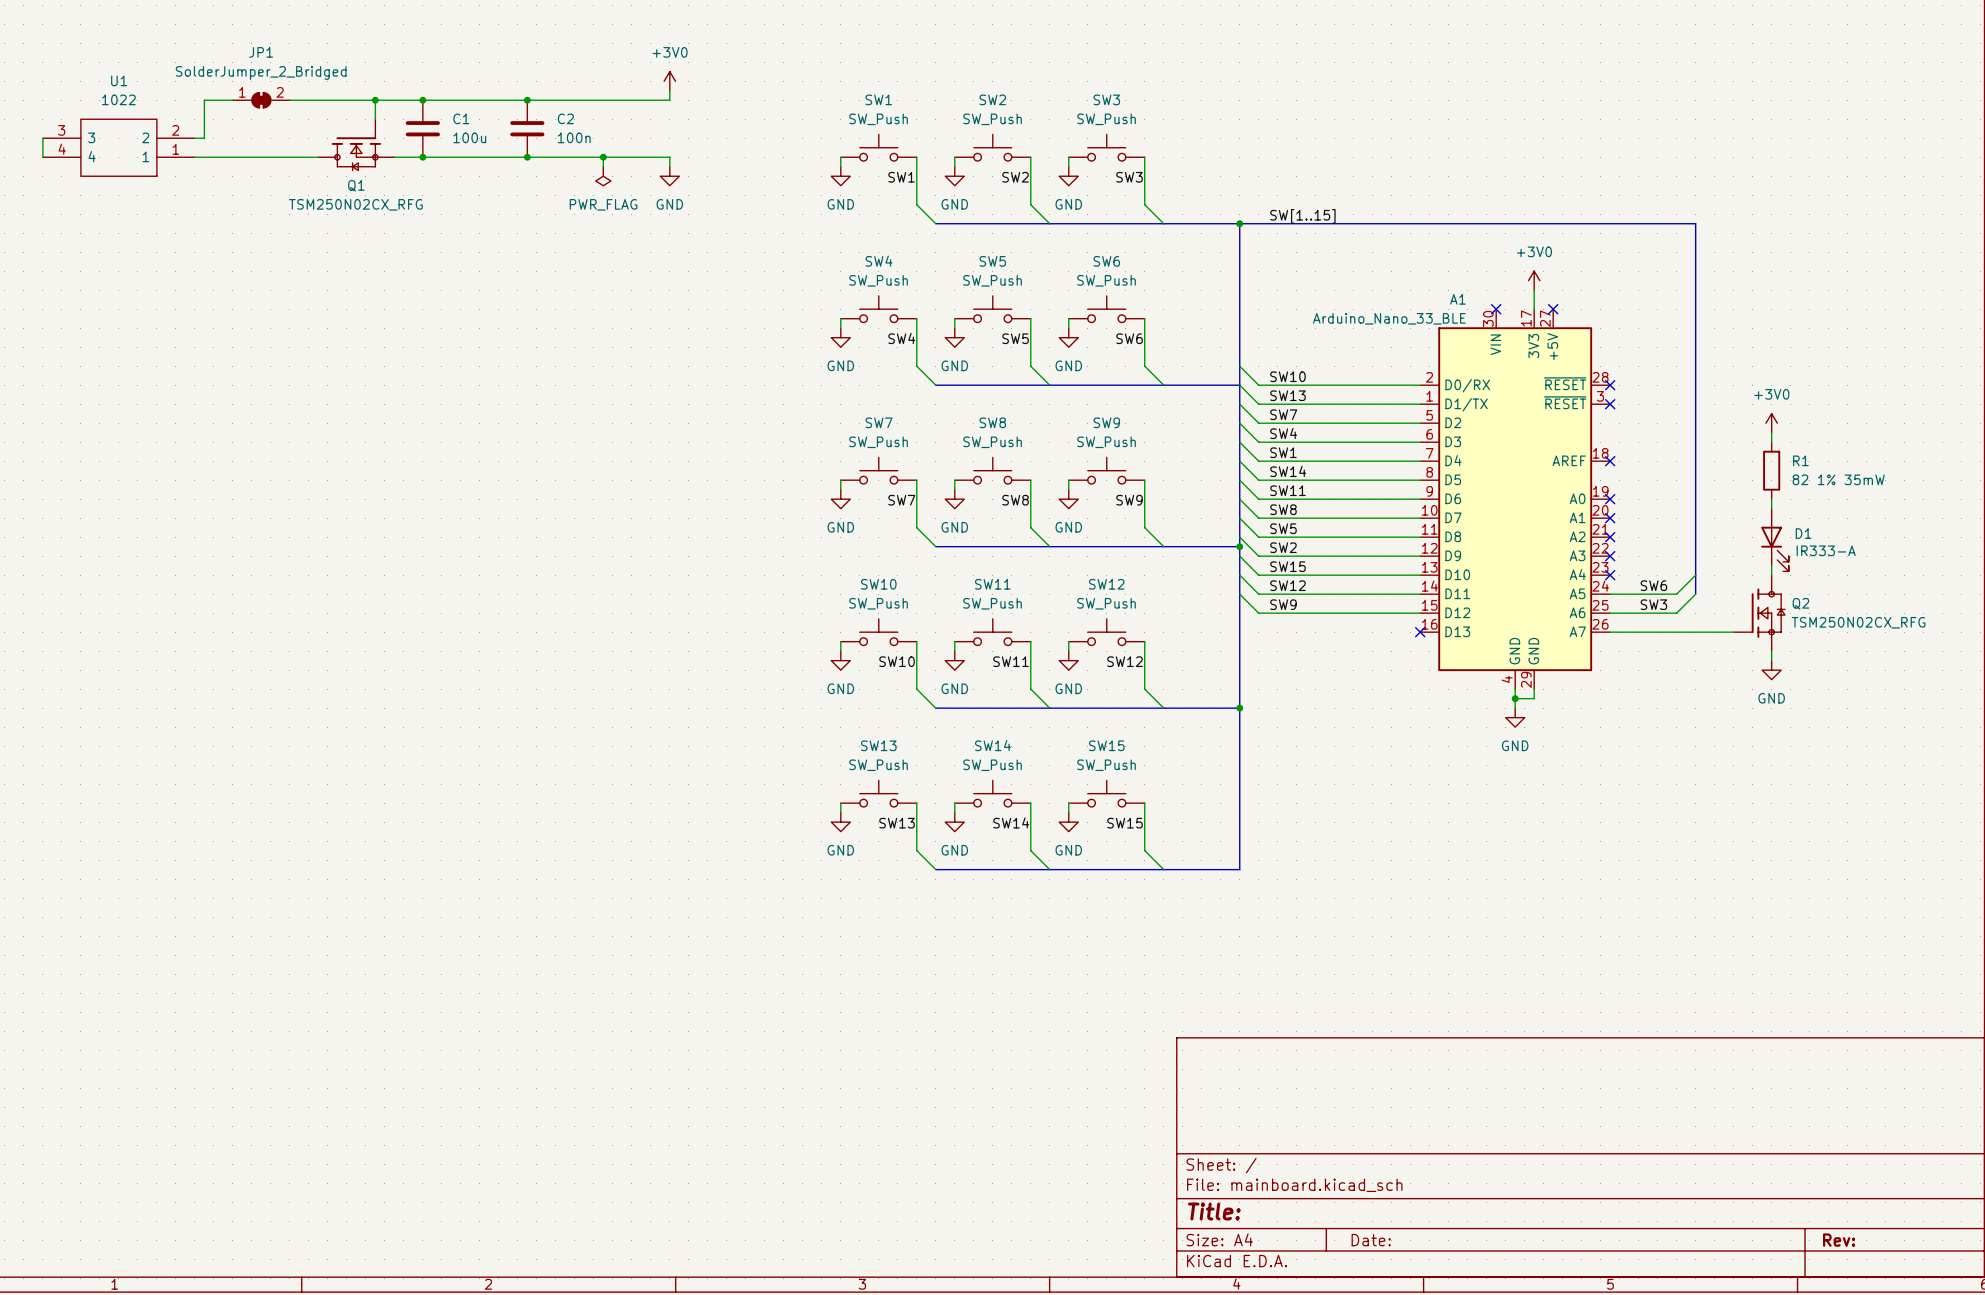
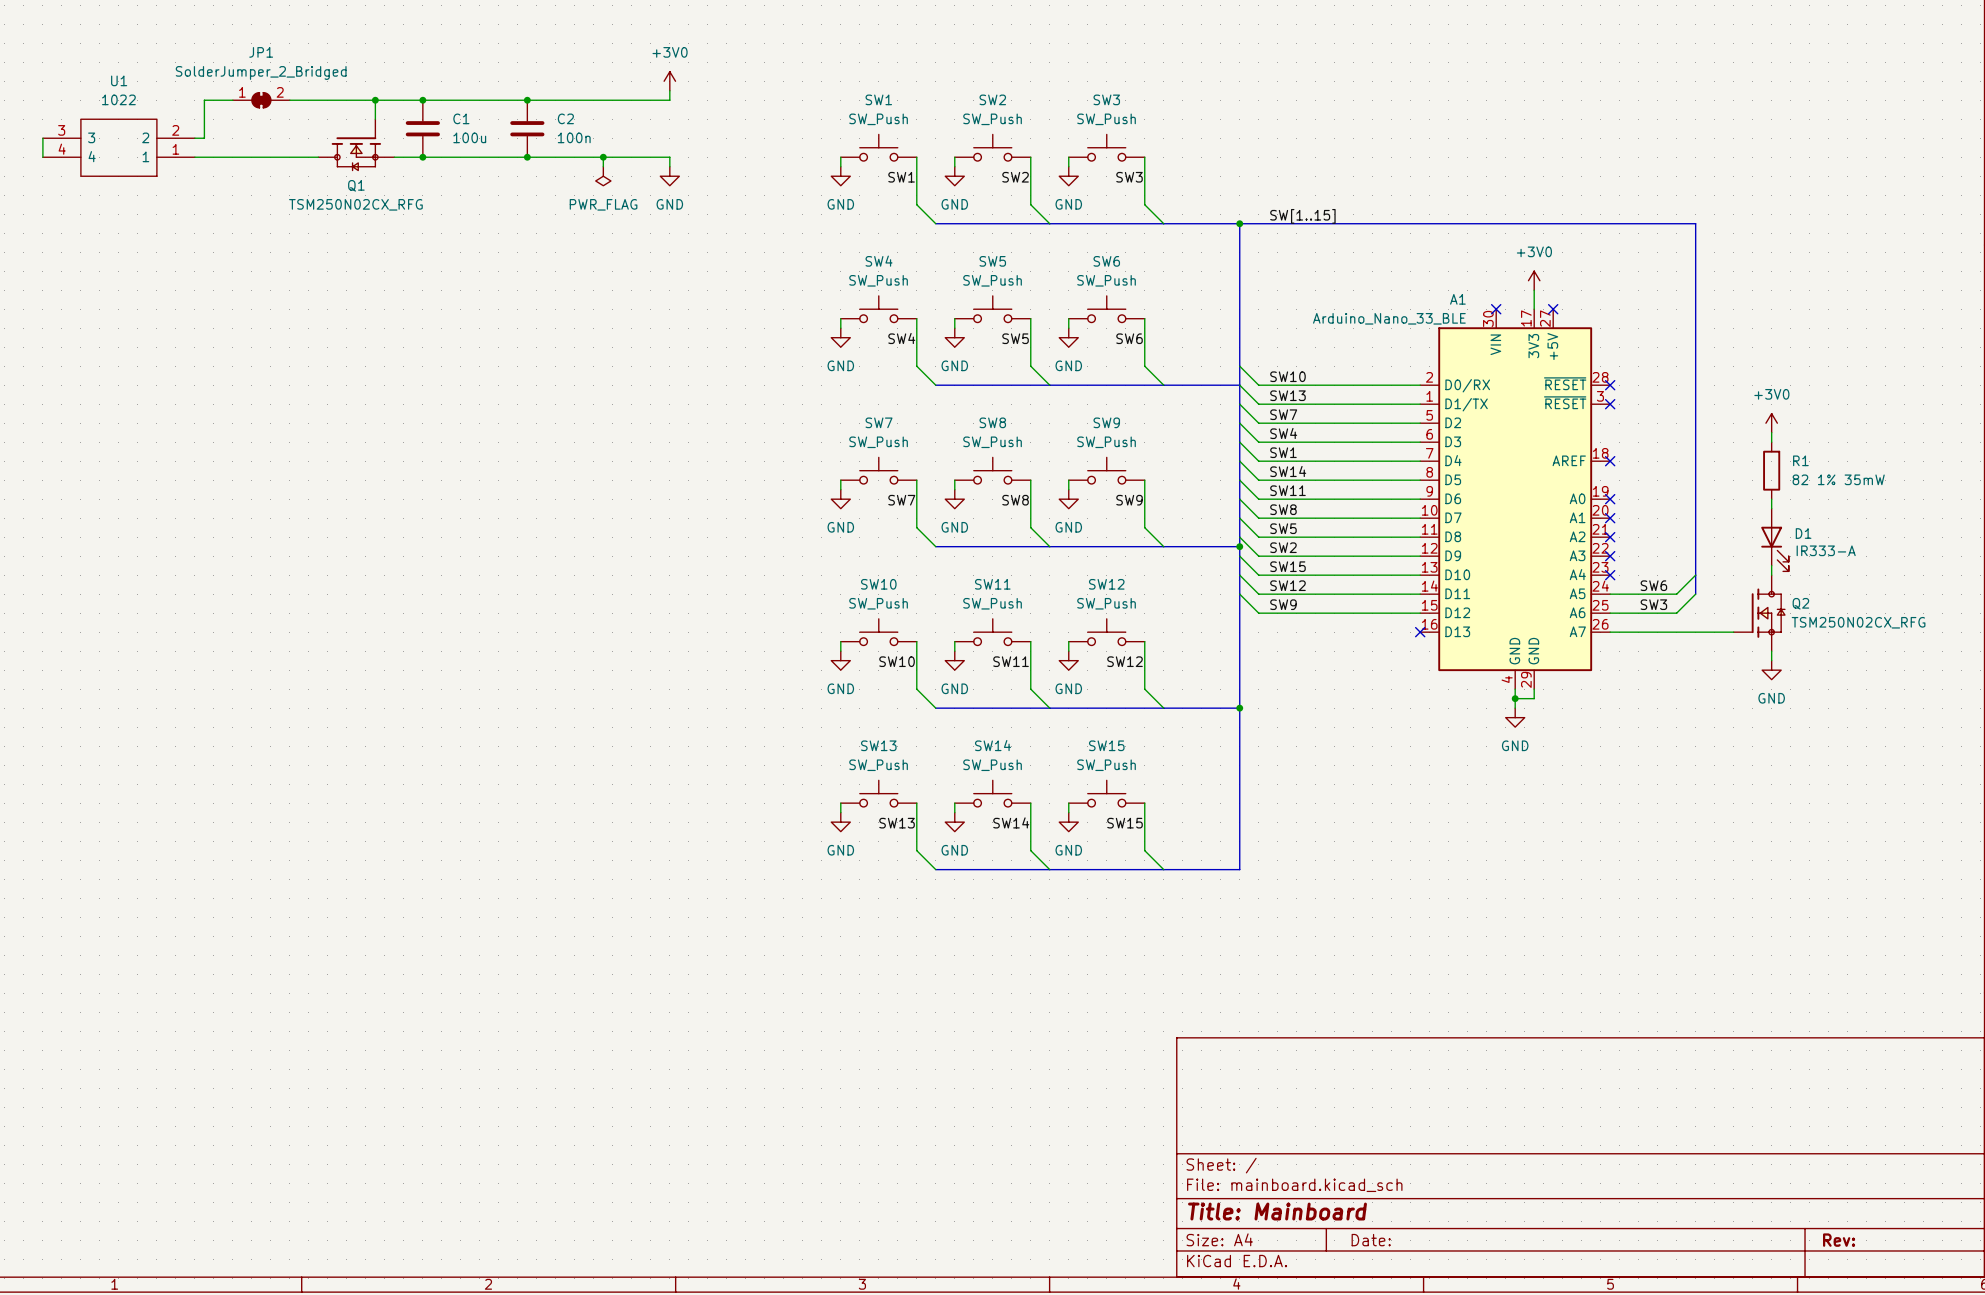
title block: Title: (1214, 1211) -> Title: Mainboard (1277, 1211)

